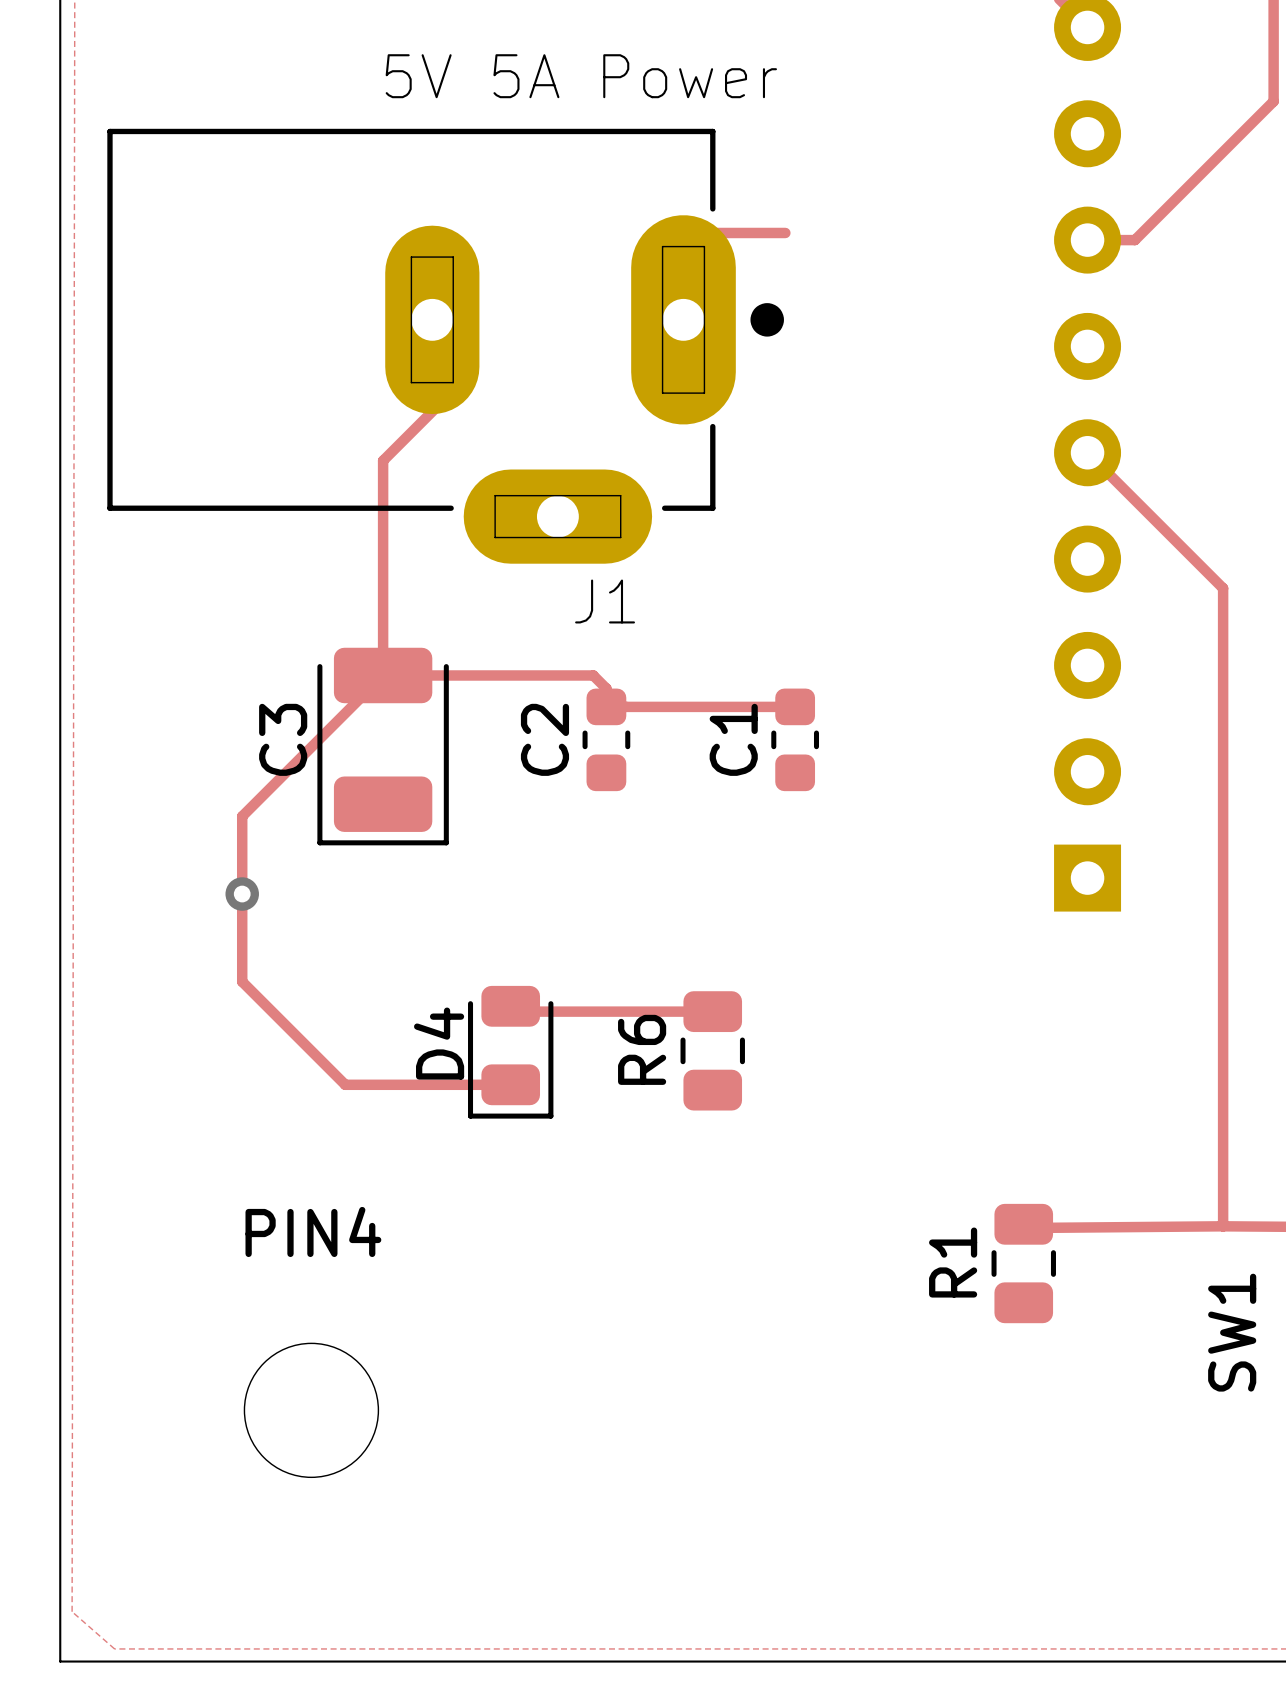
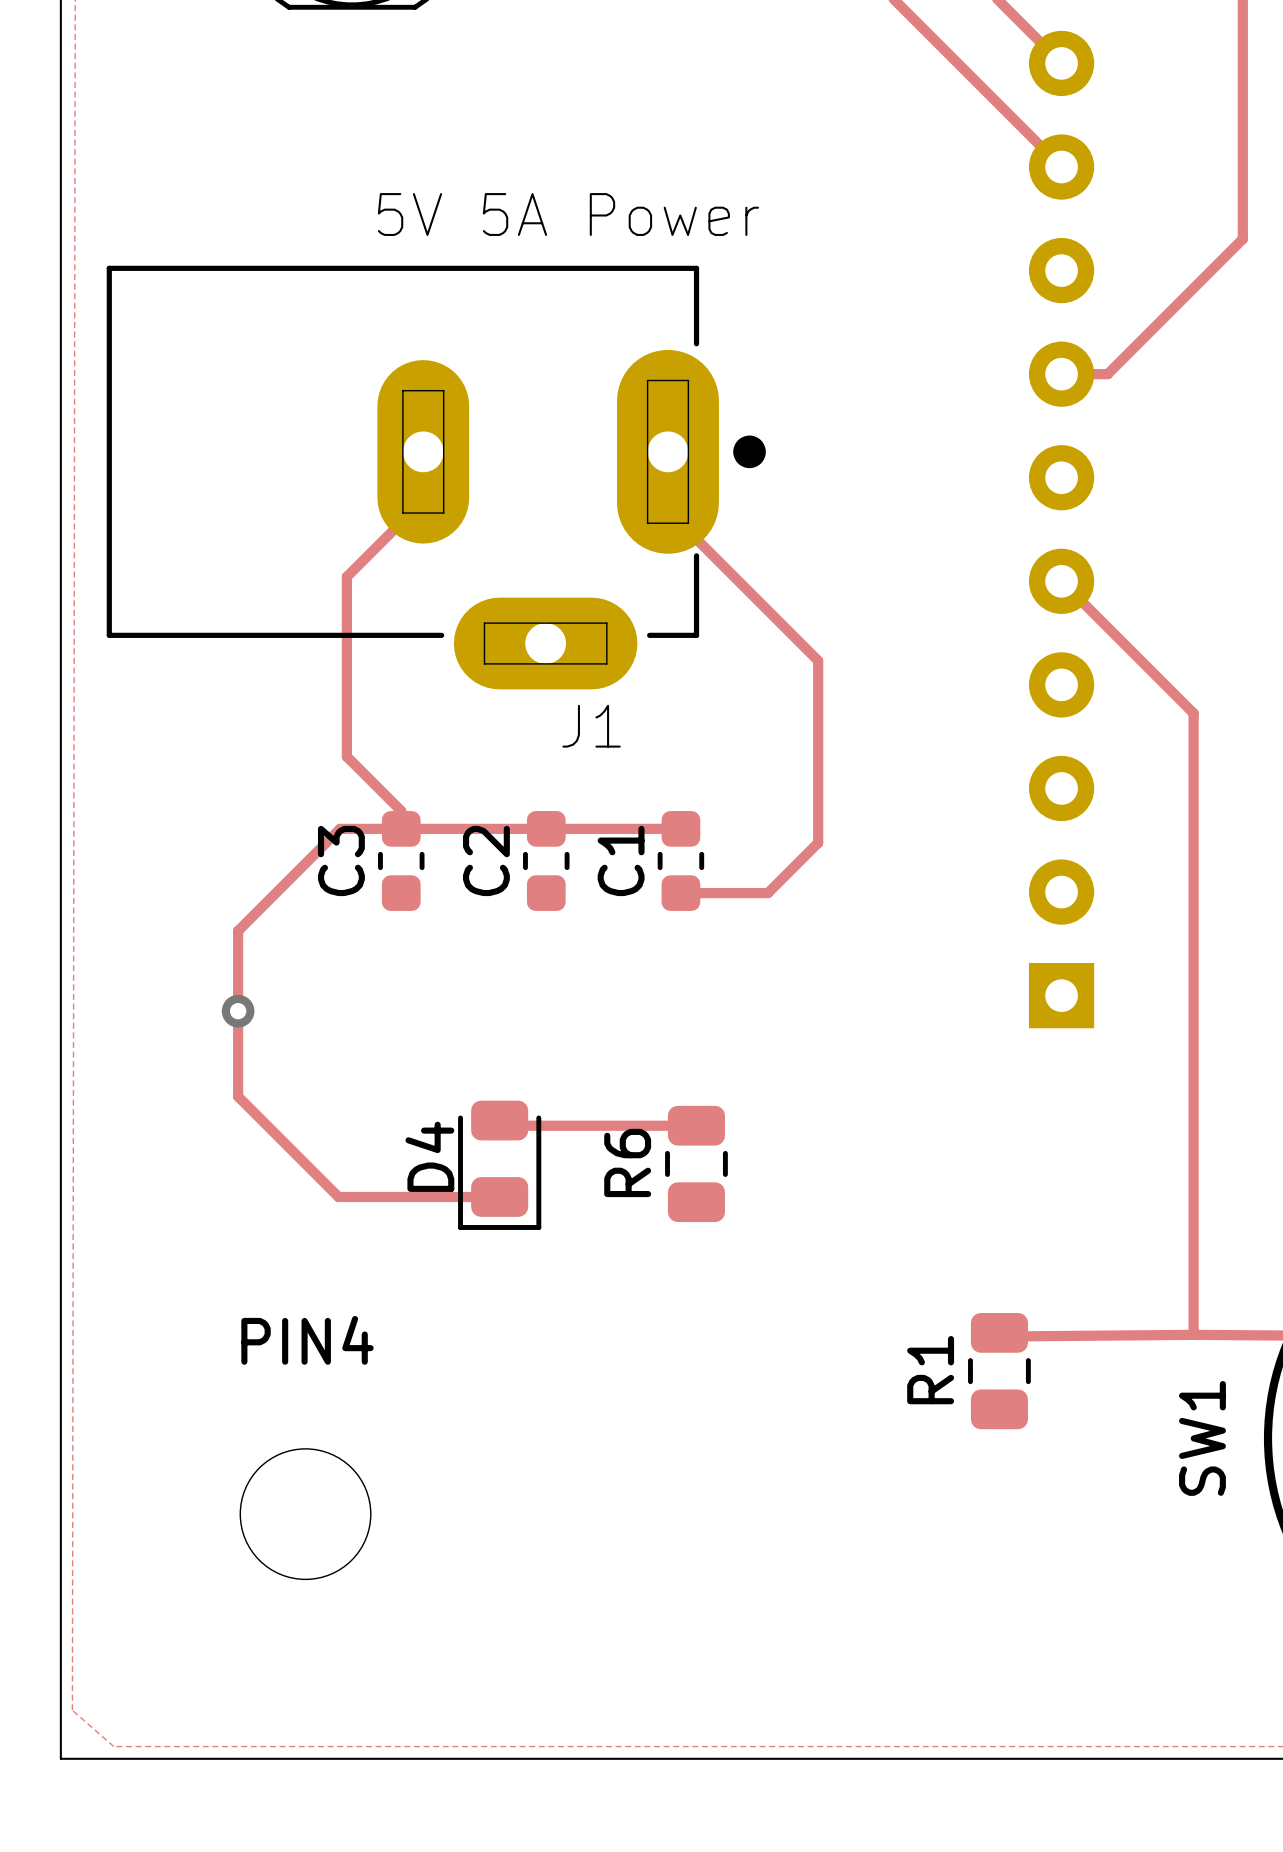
track: (668, 232) (785, 232) -> none
track: none -> (397, 526) (346, 576) (346, 756) (401, 811) (401, 828)
track: (447, 396) (383, 460) (383, 675) -> none
track: (668, 406) (710, 406) -> (680, 893) (767, 893) (818, 842) (818, 660) (693, 536)
C3 footprint: [317, 647, 449, 846] -> [378, 811, 425, 911]
track: (383, 675) (593, 675) (606, 688) (606, 706) -> (238, 935) (238, 930) (340, 828) (592, 828)
track: (383, 675) (242, 816) -> none
track: (696, 706) (795, 706) -> none
C2 position: (606, 739) -> (546, 860)
C1 position: (795, 739) -> (680, 860)

